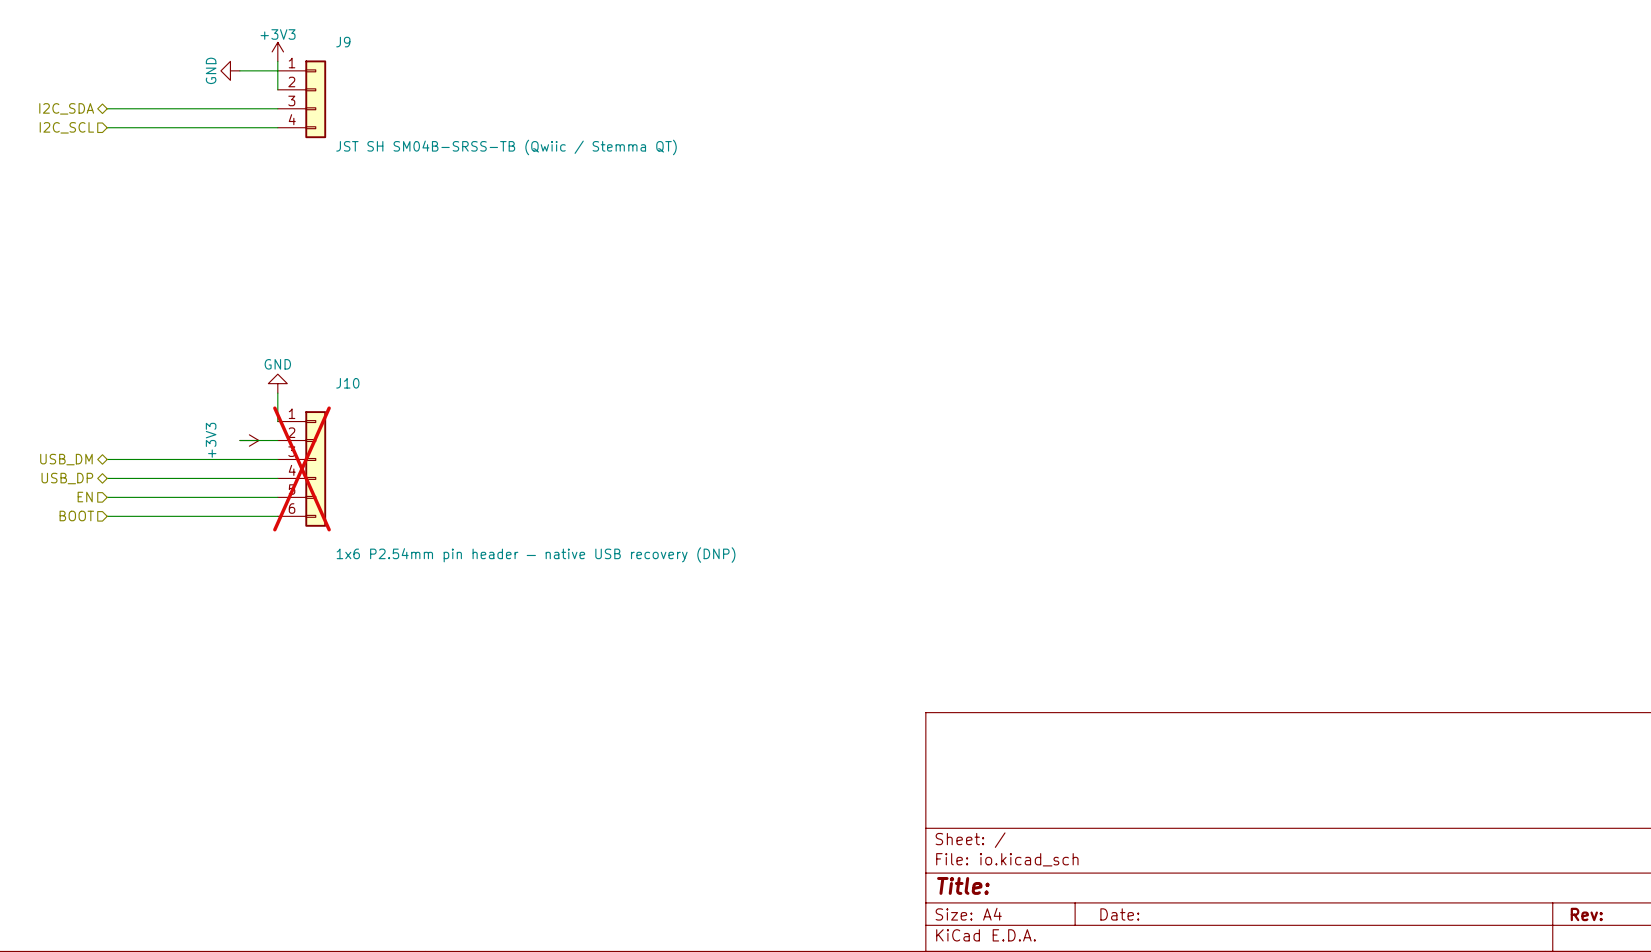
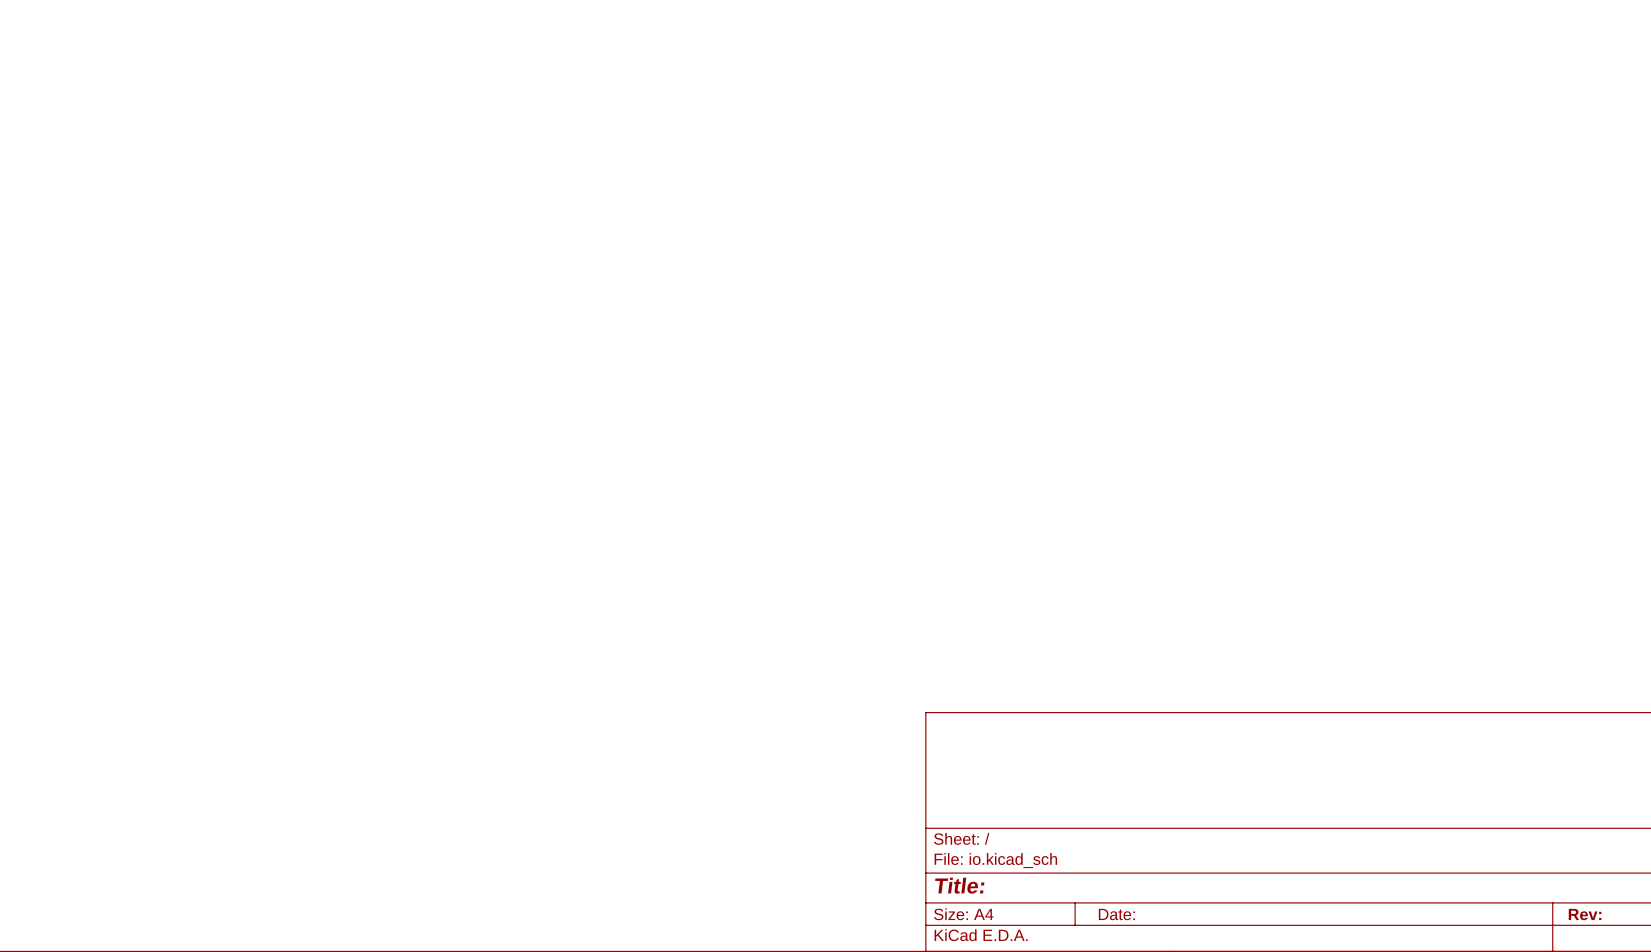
power symbol: +3V3 (277, 51) -> none
wire: (277, 61) (277, 89) -> none
power symbol: GND (230, 70) -> none
wire: (239, 70) (277, 70) -> none
J9: JST SH SM04B-SRSS-TB (Qwiic / Stemma QT) (301, 99) -> none
hierarchical label: I2C_SDA (66, 108) -> none
wire: (107, 108) (277, 108) -> none
hierarchical label: I2C_SCL (66, 127) -> none
wire: (107, 127) (277, 127) -> none
power symbol: GND (277, 383) -> none
wire: (277, 393) (277, 421) -> none
wire: (239, 440) (277, 440) -> none
power symbol: +3V3 (249, 440) -> none
hierarchical label: USB_DM (66, 459) -> none
wire: (107, 459) (277, 459) -> none
J10: 1x6 P2.54mm pin header — native USB recovery (DNP) (301, 468) -> none
hierarchical label: USB_DP (67, 478) -> none
wire: (107, 478) (277, 478) -> none
hierarchical label: EN (85, 497) -> none
wire: (107, 497) (277, 497) -> none
hierarchical label: BOOT (76, 515) -> none
wire: (107, 516) (277, 516) -> none

